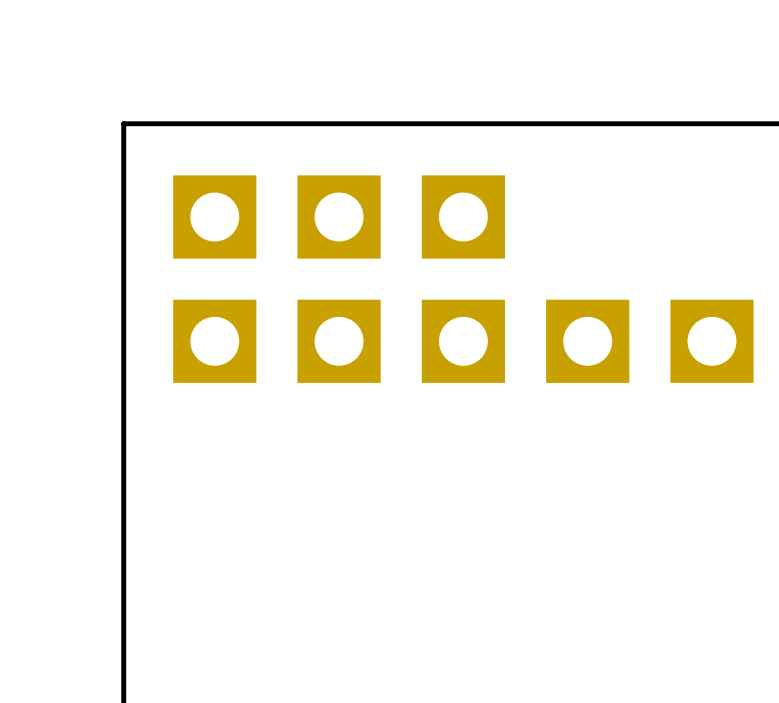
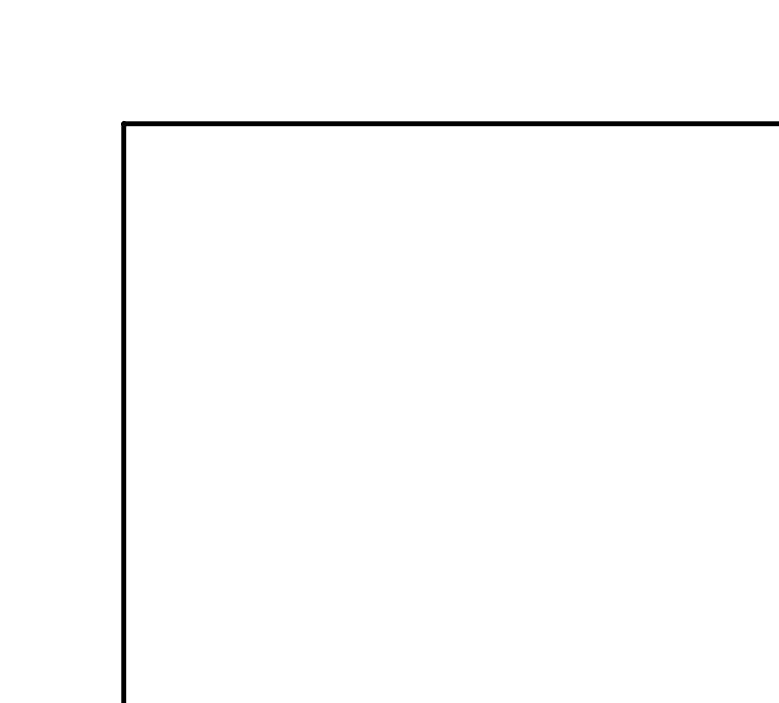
part: (214, 217) -> none
part: (339, 217) -> none
part: (463, 217) -> none
part: (214, 341) -> none
part: (339, 341) -> none
part: (463, 341) -> none
part: (587, 341) -> none
part: (711, 341) -> none

